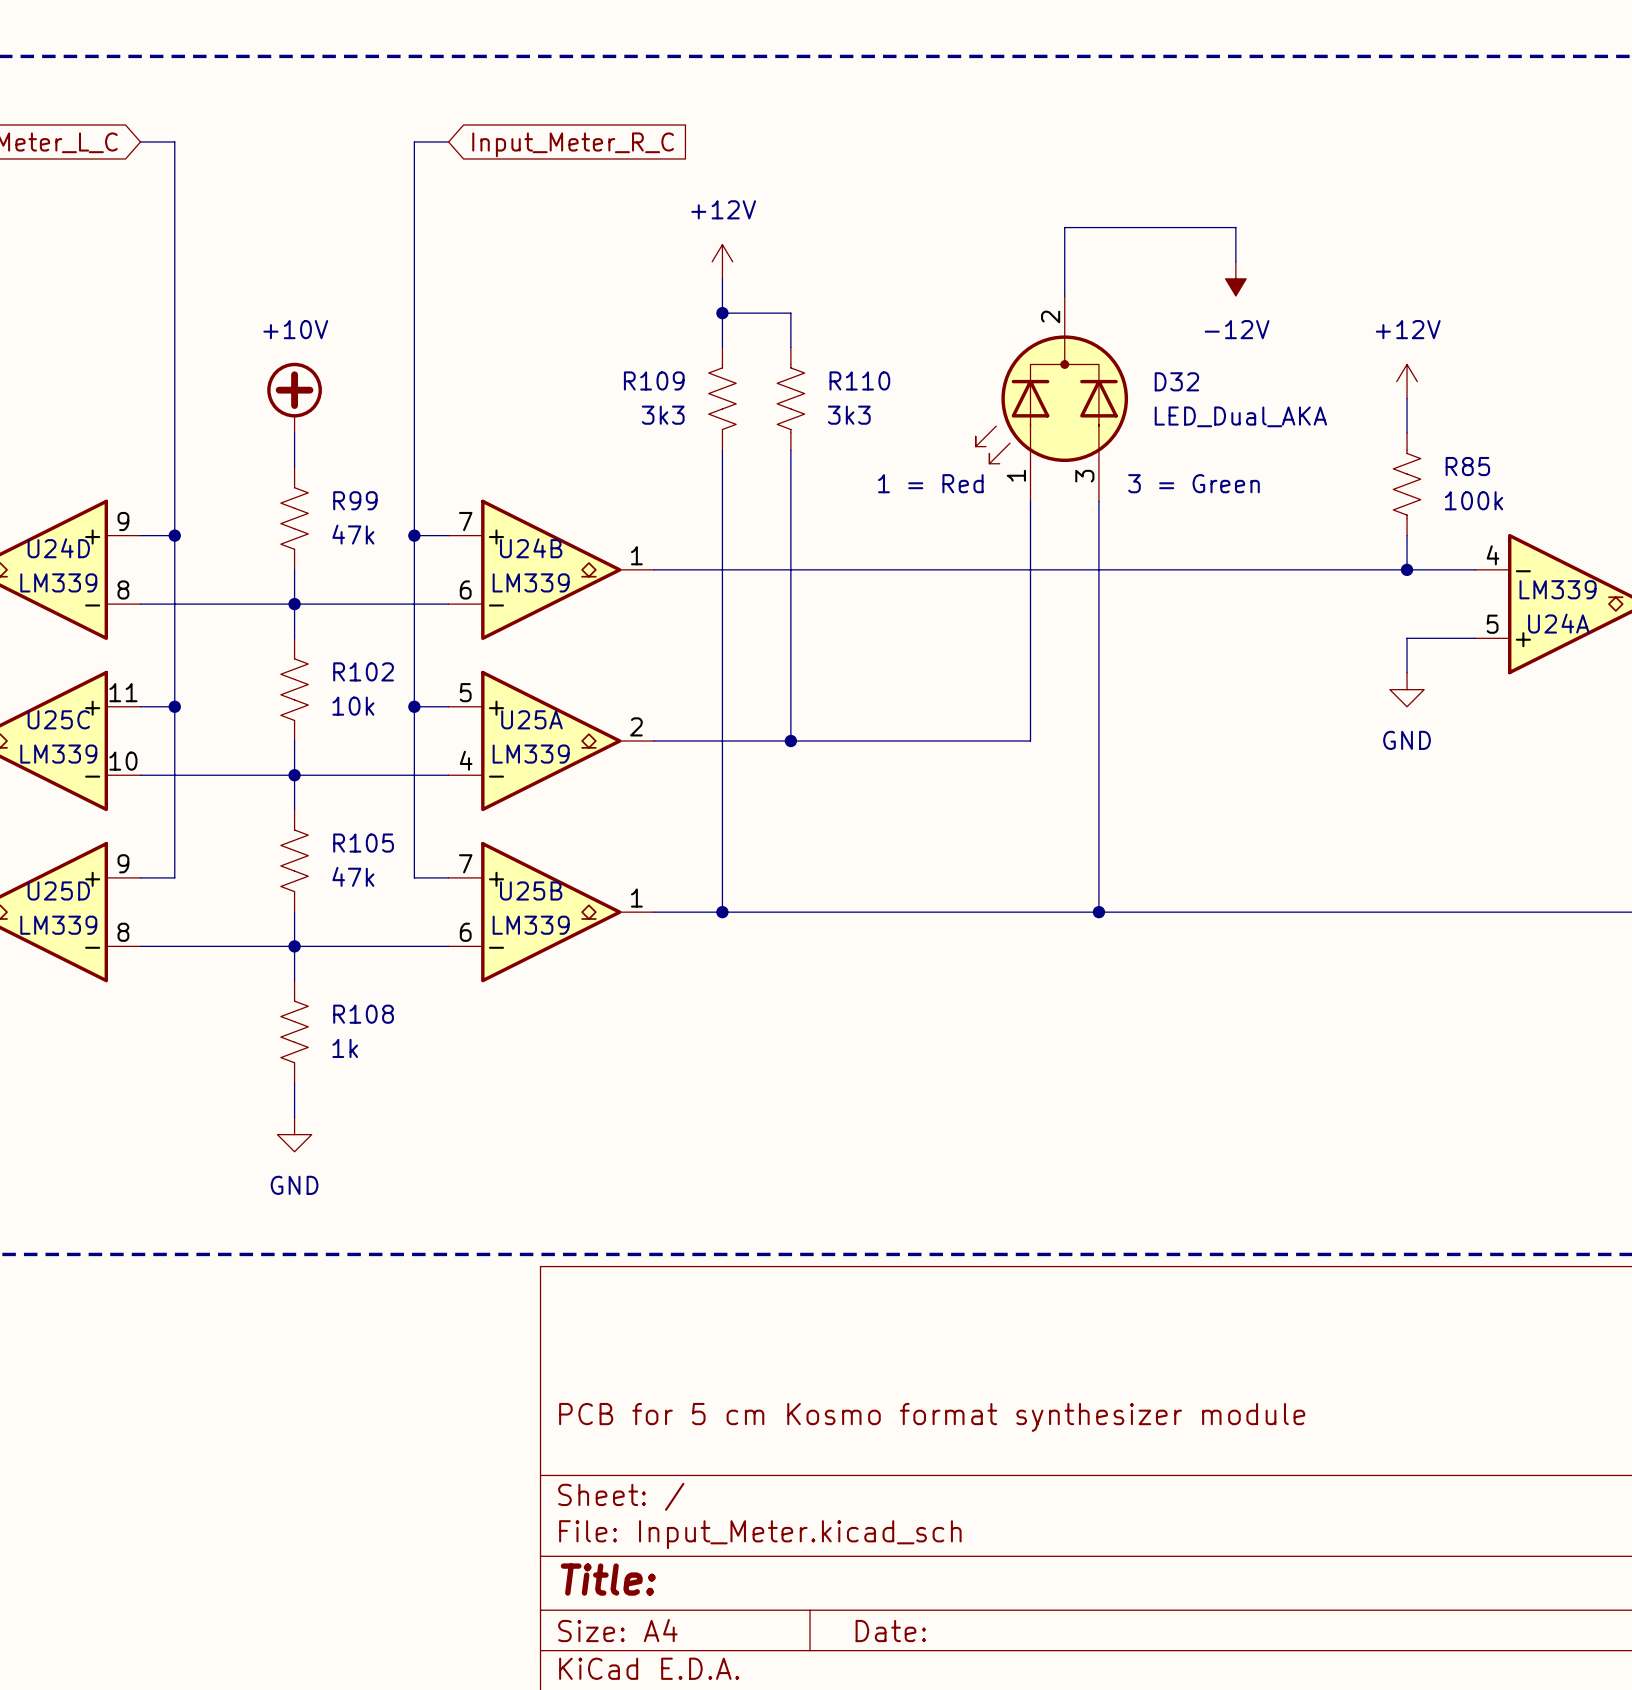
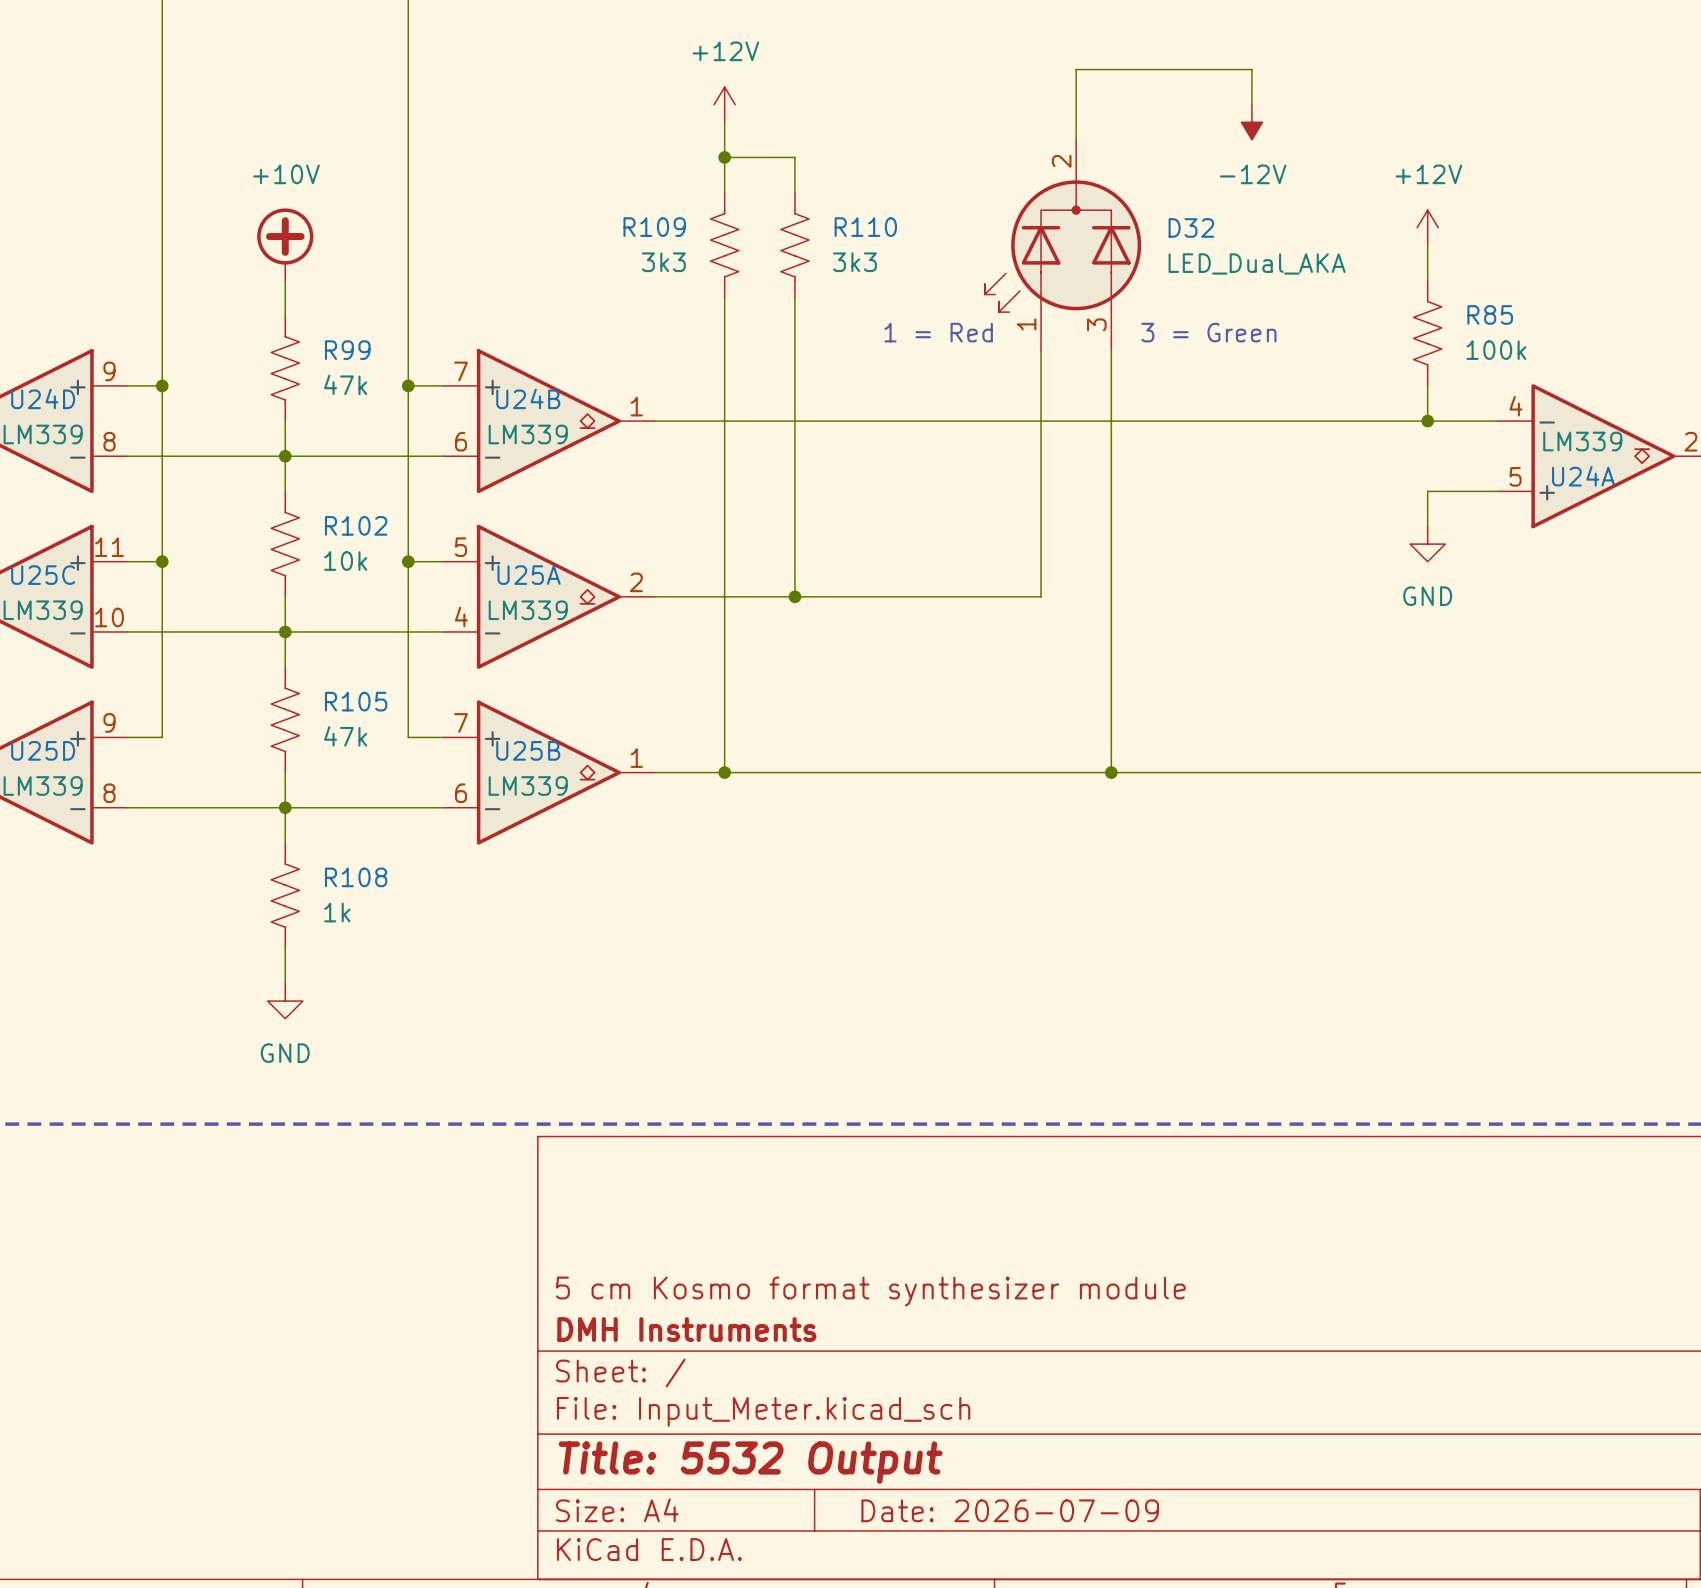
title block: PCB for 5 cm Kosmo format synthesizer module (932, 1417) -> 5 cm Kosmo format synthesizer module (870, 1291)
title block: none -> DMH Instruments (686, 1329)
title block: Title: (608, 1579) -> Title: 5532 Output (750, 1462)
title block: Date: (890, 1631) -> Date: 2026-07-09 (1010, 1510)

